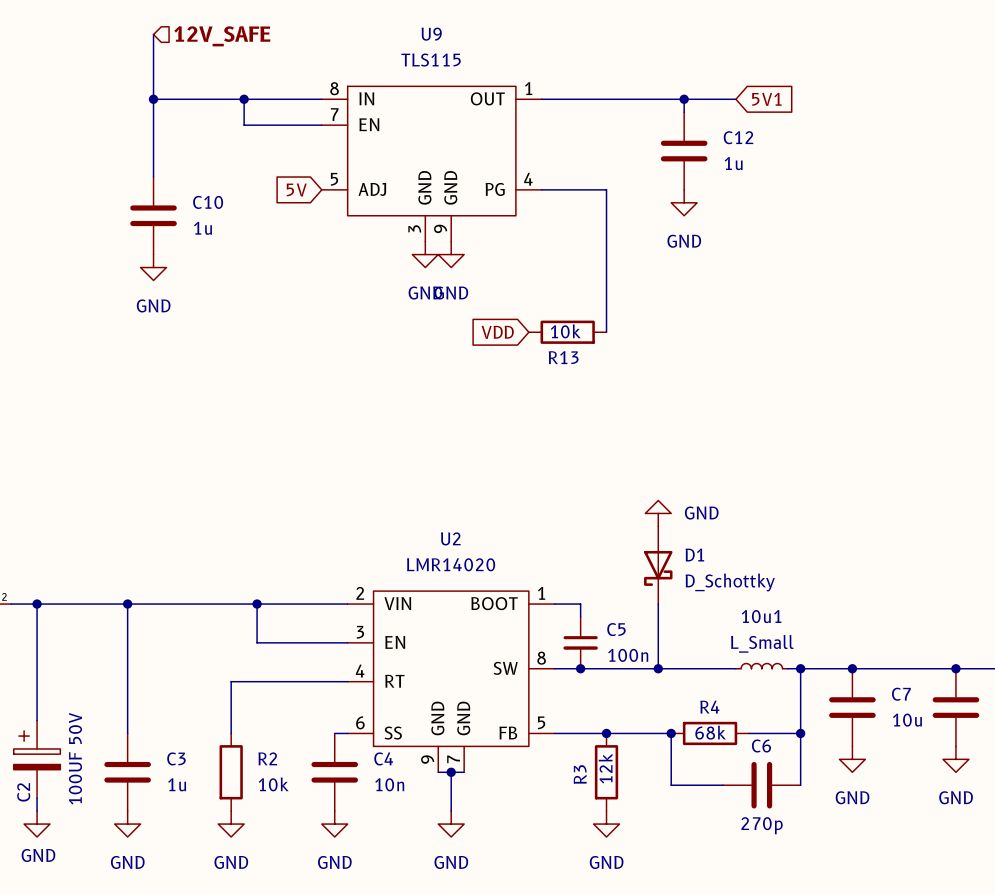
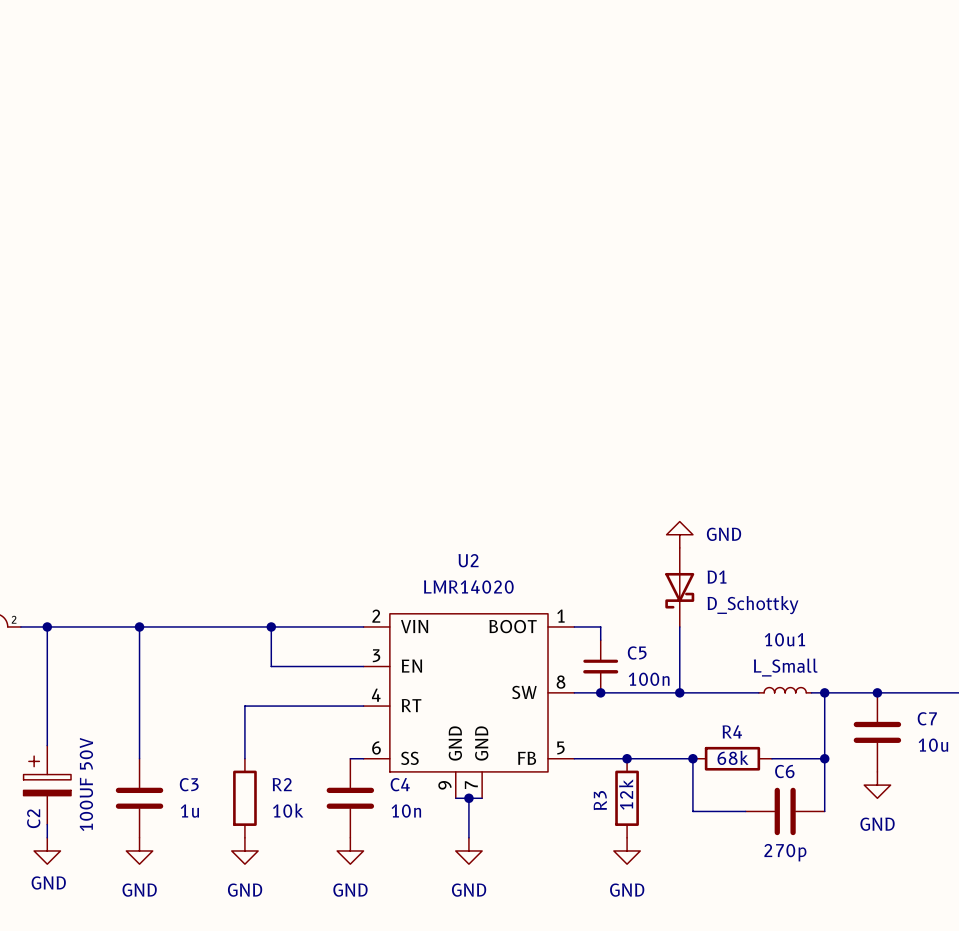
wire: (153, 34) (153, 176) -> none
hierarchical label: 12V_SAFE (222, 36) -> none
wire: (153, 99) (321, 99) -> none
junction: (153, 99) -> none
wire: (244, 99) (244, 125) (321, 125) -> none
junction: (244, 99) -> none
wire: (541, 99) (735, 99) -> none
wire: (684, 99) (684, 112) -> none
junction: (684, 99) -> none
global label: 5V1 (766, 99) -> none
C12: 1u (684, 151) -> none
U9: TLS115 (431, 163) -> none
global label: 5V (296, 189) -> none
wire: (541, 189) (606, 189) (606, 332) -> none
power symbol: GND (684, 202) -> none
C10: 1u (153, 215) -> none
power symbol: GND (425, 254) -> none
power symbol: GND (451, 254) -> none
power symbol: GND (153, 267) -> none
global label: VDD (497, 332) -> none
R13: 10k (567, 332) -> none

